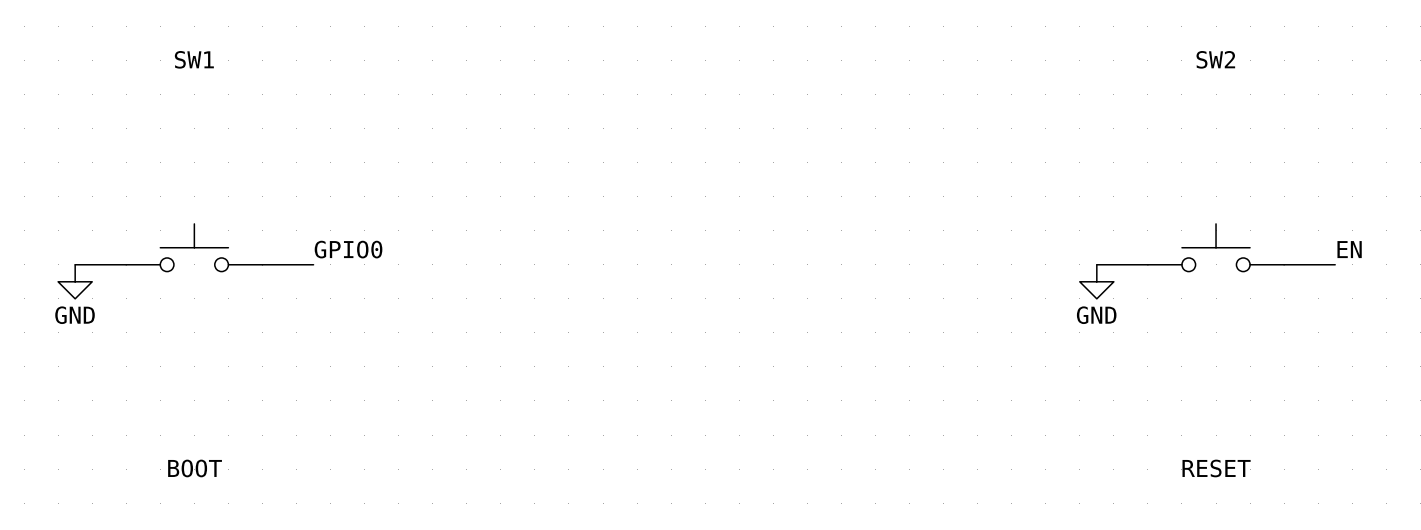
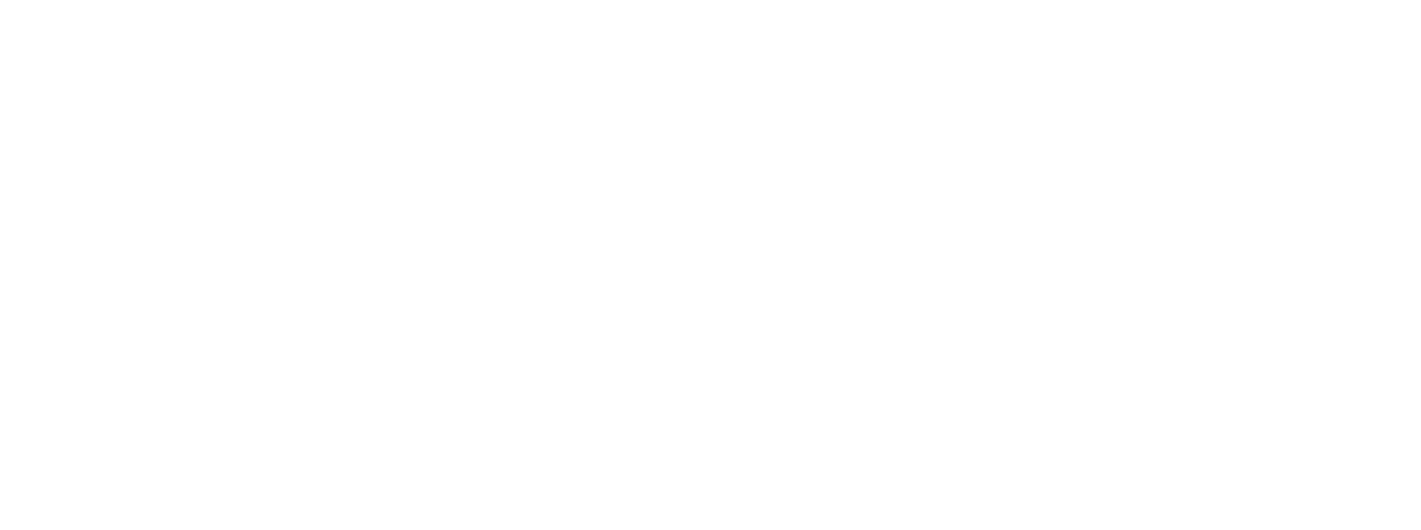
SW1: BOOT (194, 247) -> none
SW2: RESET (1216, 247) -> none
label: GPIO0 (348, 249) -> none
label: EN (1349, 249) -> none
wire: (75, 264) (126, 264) -> none
wire: (262, 264) (313, 264) -> none
wire: (1096, 264) (1147, 264) -> none
wire: (1284, 264) (1335, 264) -> none
power symbol: GND (75, 281) -> none
power symbol: GND (1096, 281) -> none

